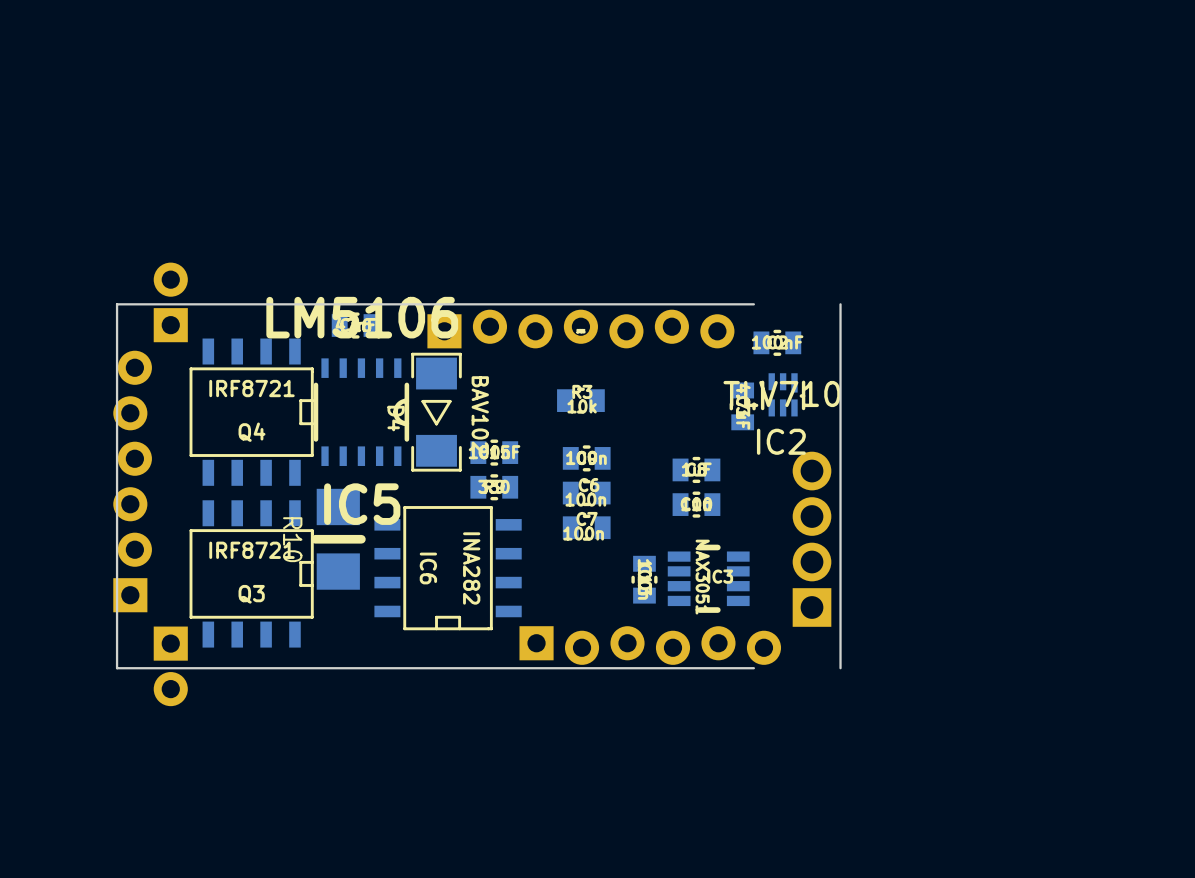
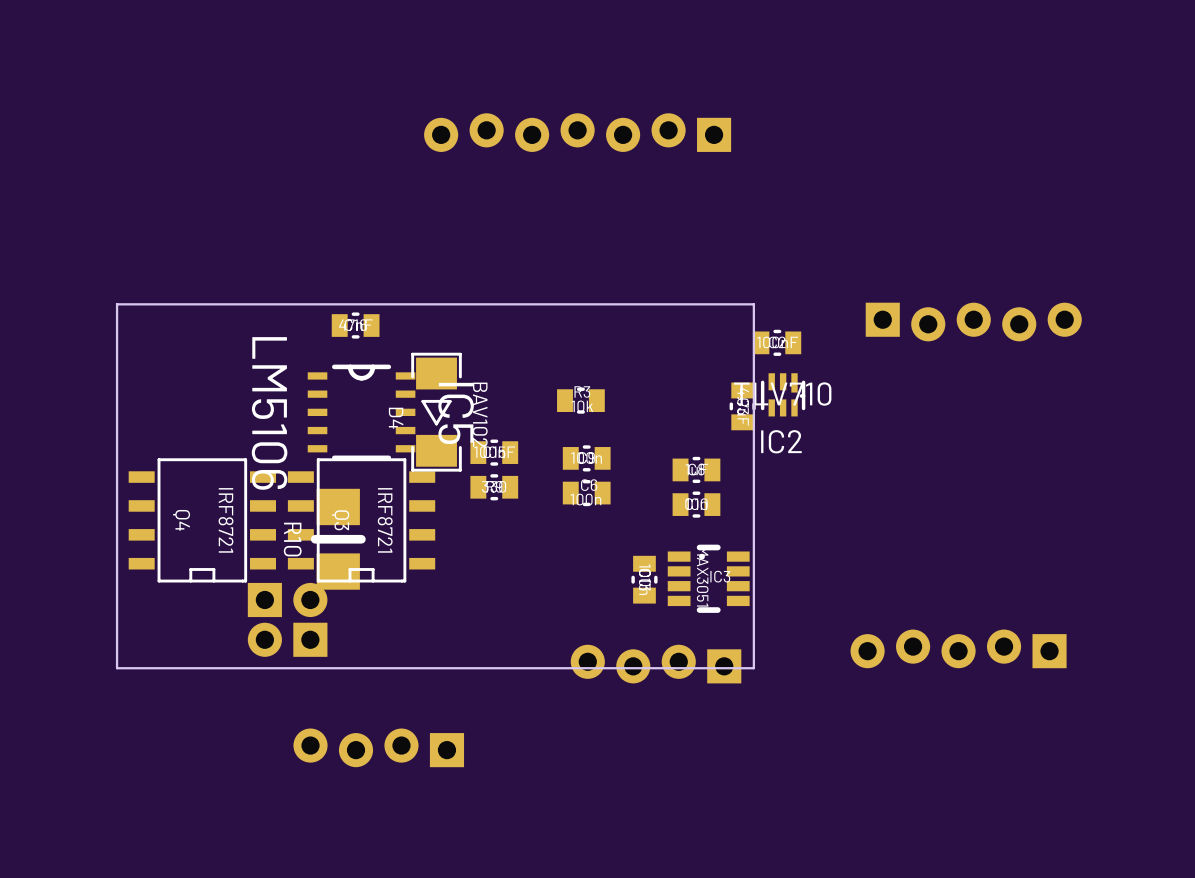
part: (170, 302) -> none
board edge: (840, 304) (840, 668) -> (753, 304) (753, 668)
part: none -> (973, 322)
part side: bottom (580, 329) -> top (577, 132)
Q4 rotation: 0° (251, 412) -> 90° clockwise (202, 520)
Q4 position: (251, 412) -> (202, 520)
IC5 rotation: 0° (361, 412) -> 90° counterclockwise (361, 412)
part: (132, 481) -> none
C7: 100n (586, 527) -> none
part: (812, 539) -> none
IC6: INA282 (448, 568) -> none
Q3 rotation: 0° (251, 573) -> 90° clockwise (361, 520)
Q3 position: (251, 573) -> (361, 520)
part: none -> (287, 599)
part footprint: [519, 626, 782, 665] -> [570, 644, 742, 684]
part: none -> (287, 639)
part: none -> (958, 648)
part: (170, 666) -> none
part: none -> (378, 747)

